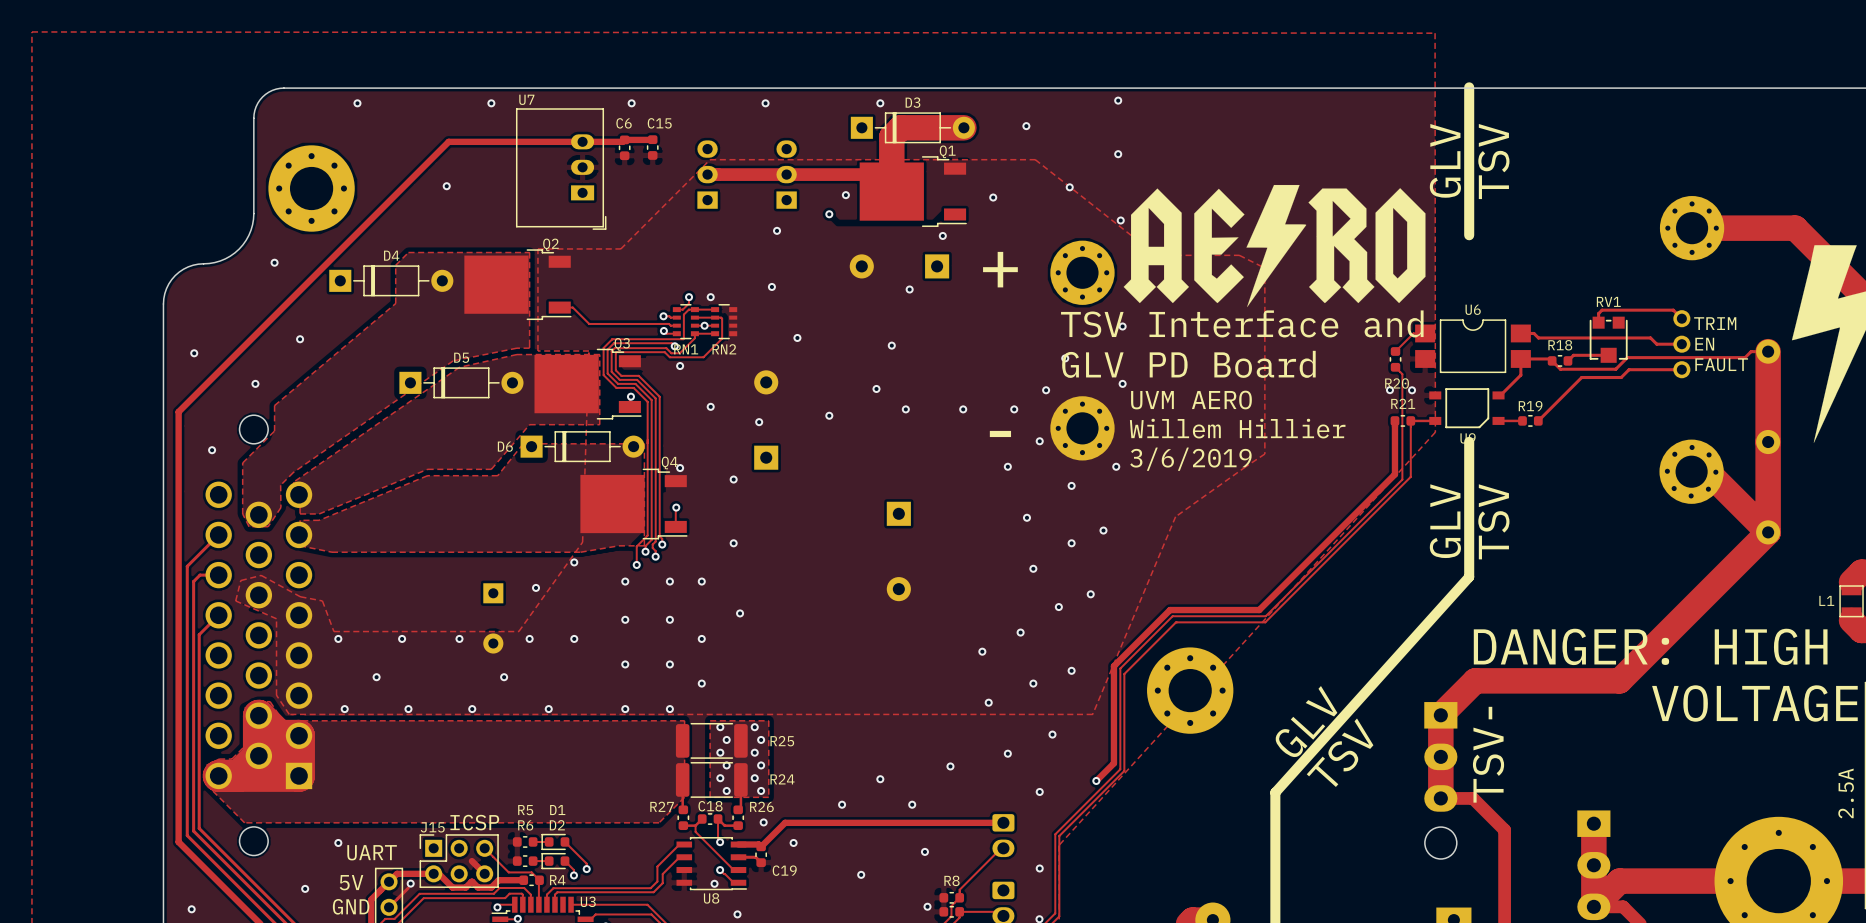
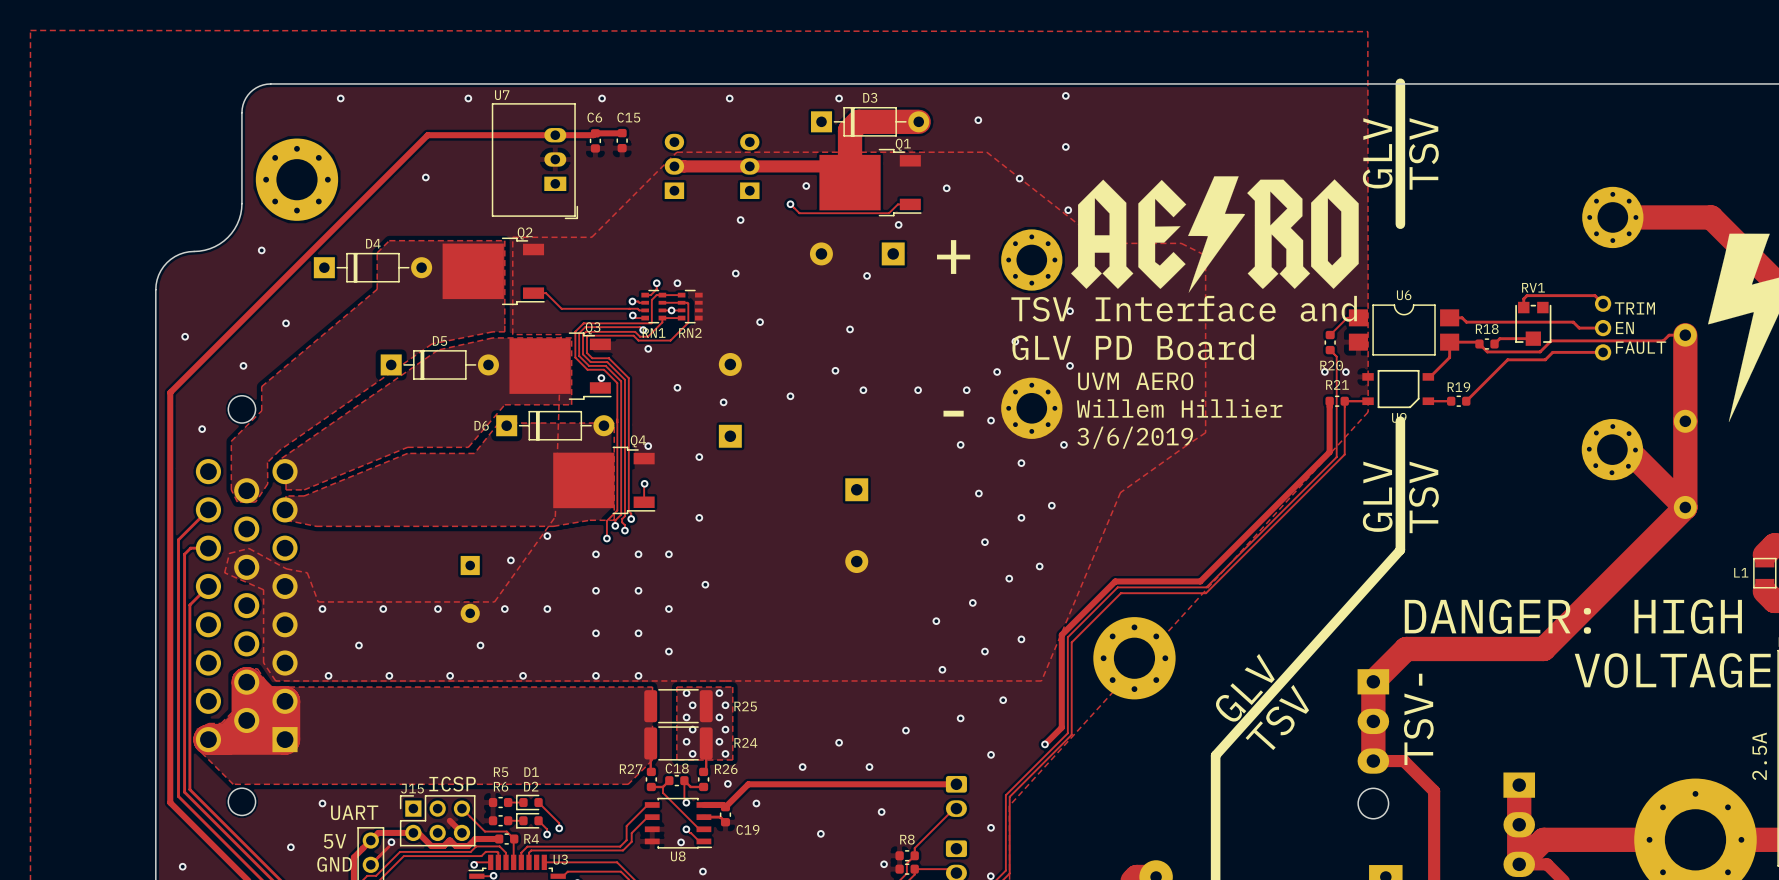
track: none -> (790, 204) (799, 213) (889, 213) (897, 204) (910, 204)

